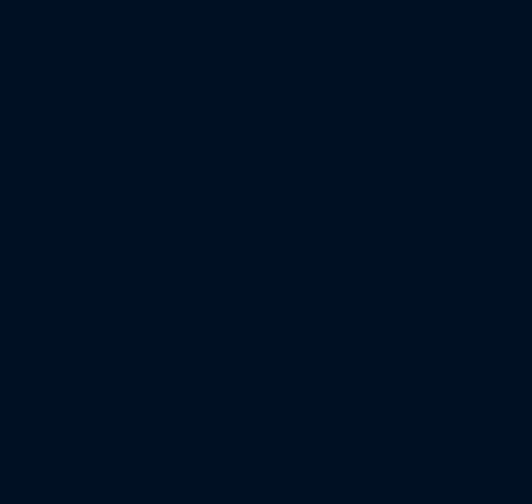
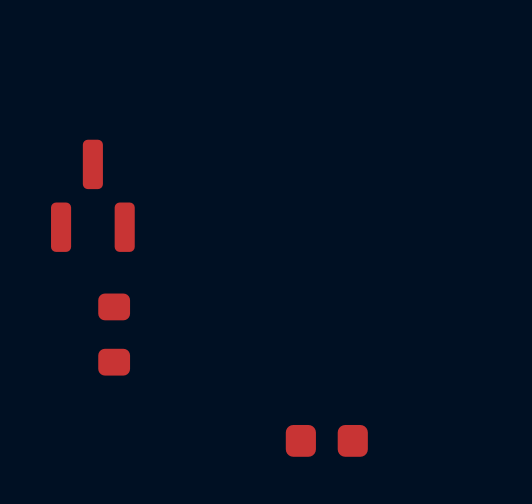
part: none -> (92, 195)
part: none -> (114, 334)
part: none -> (326, 440)

